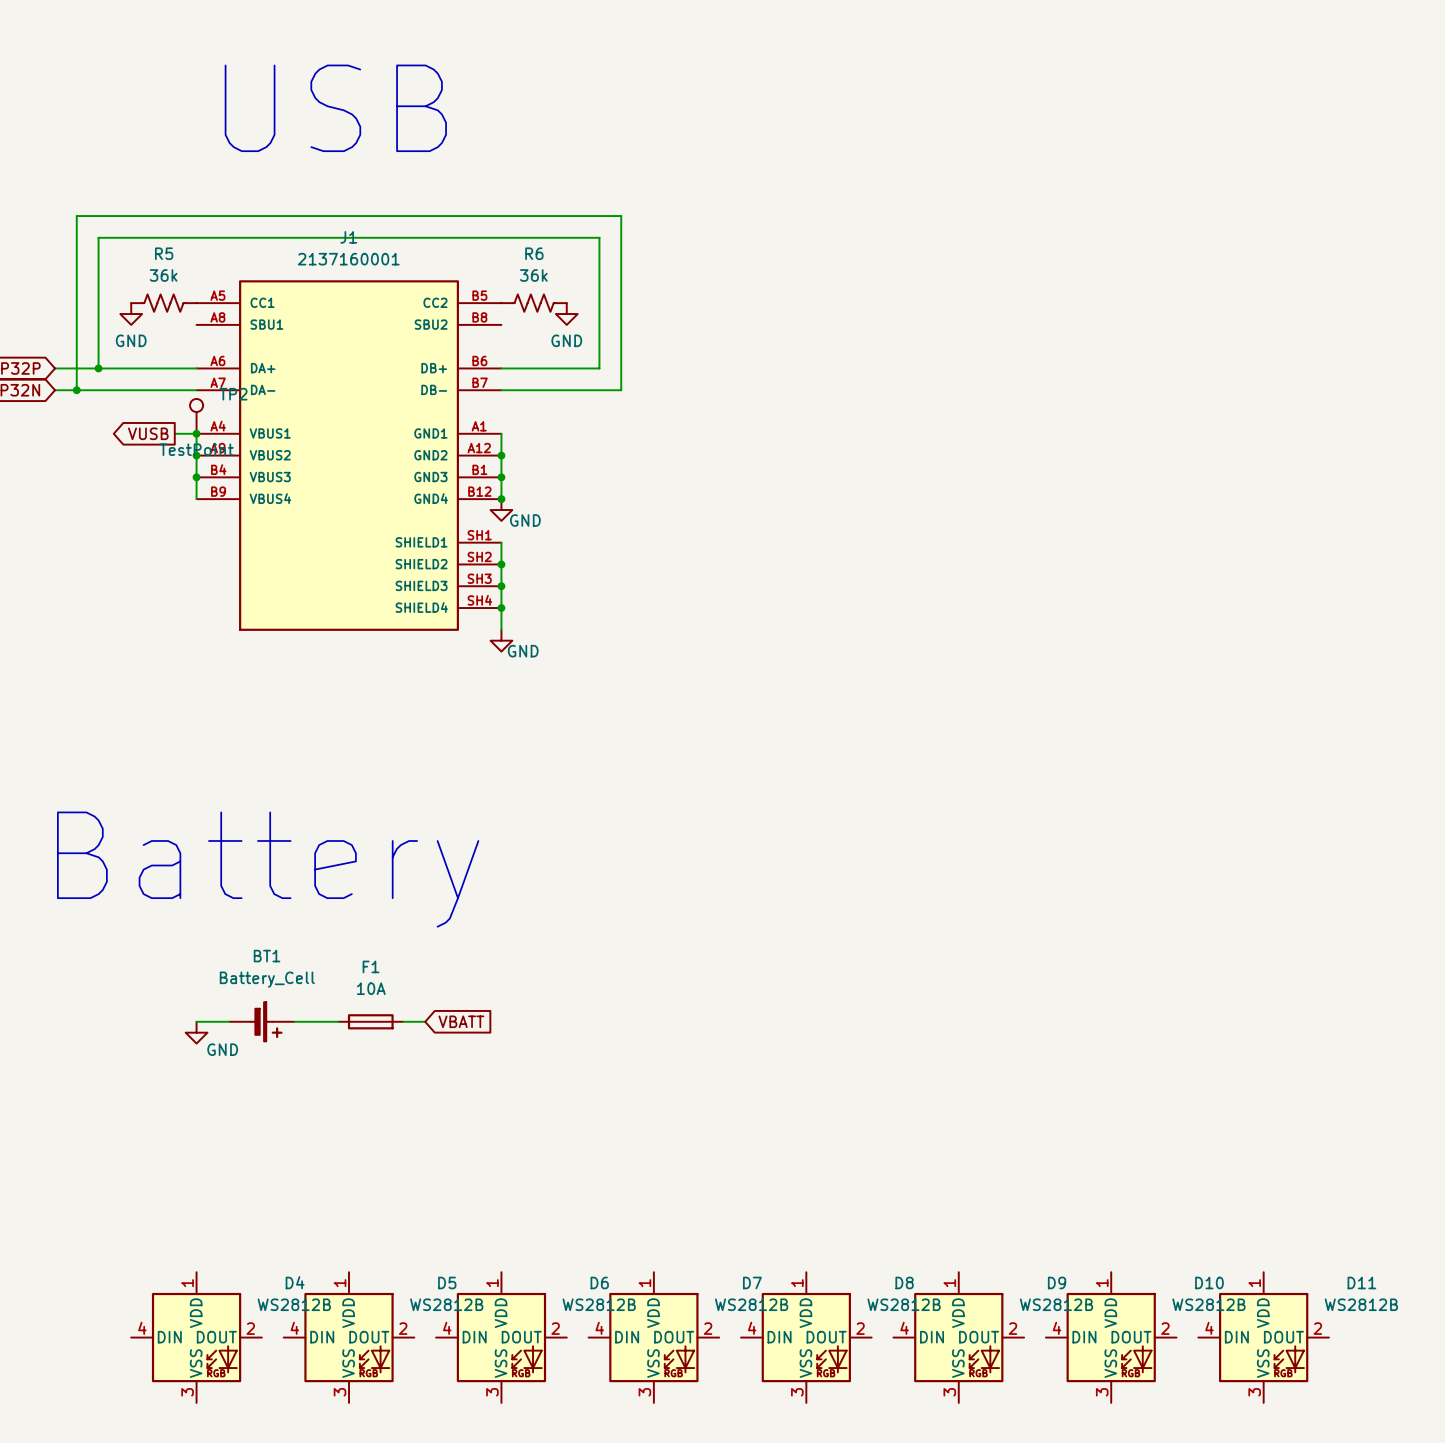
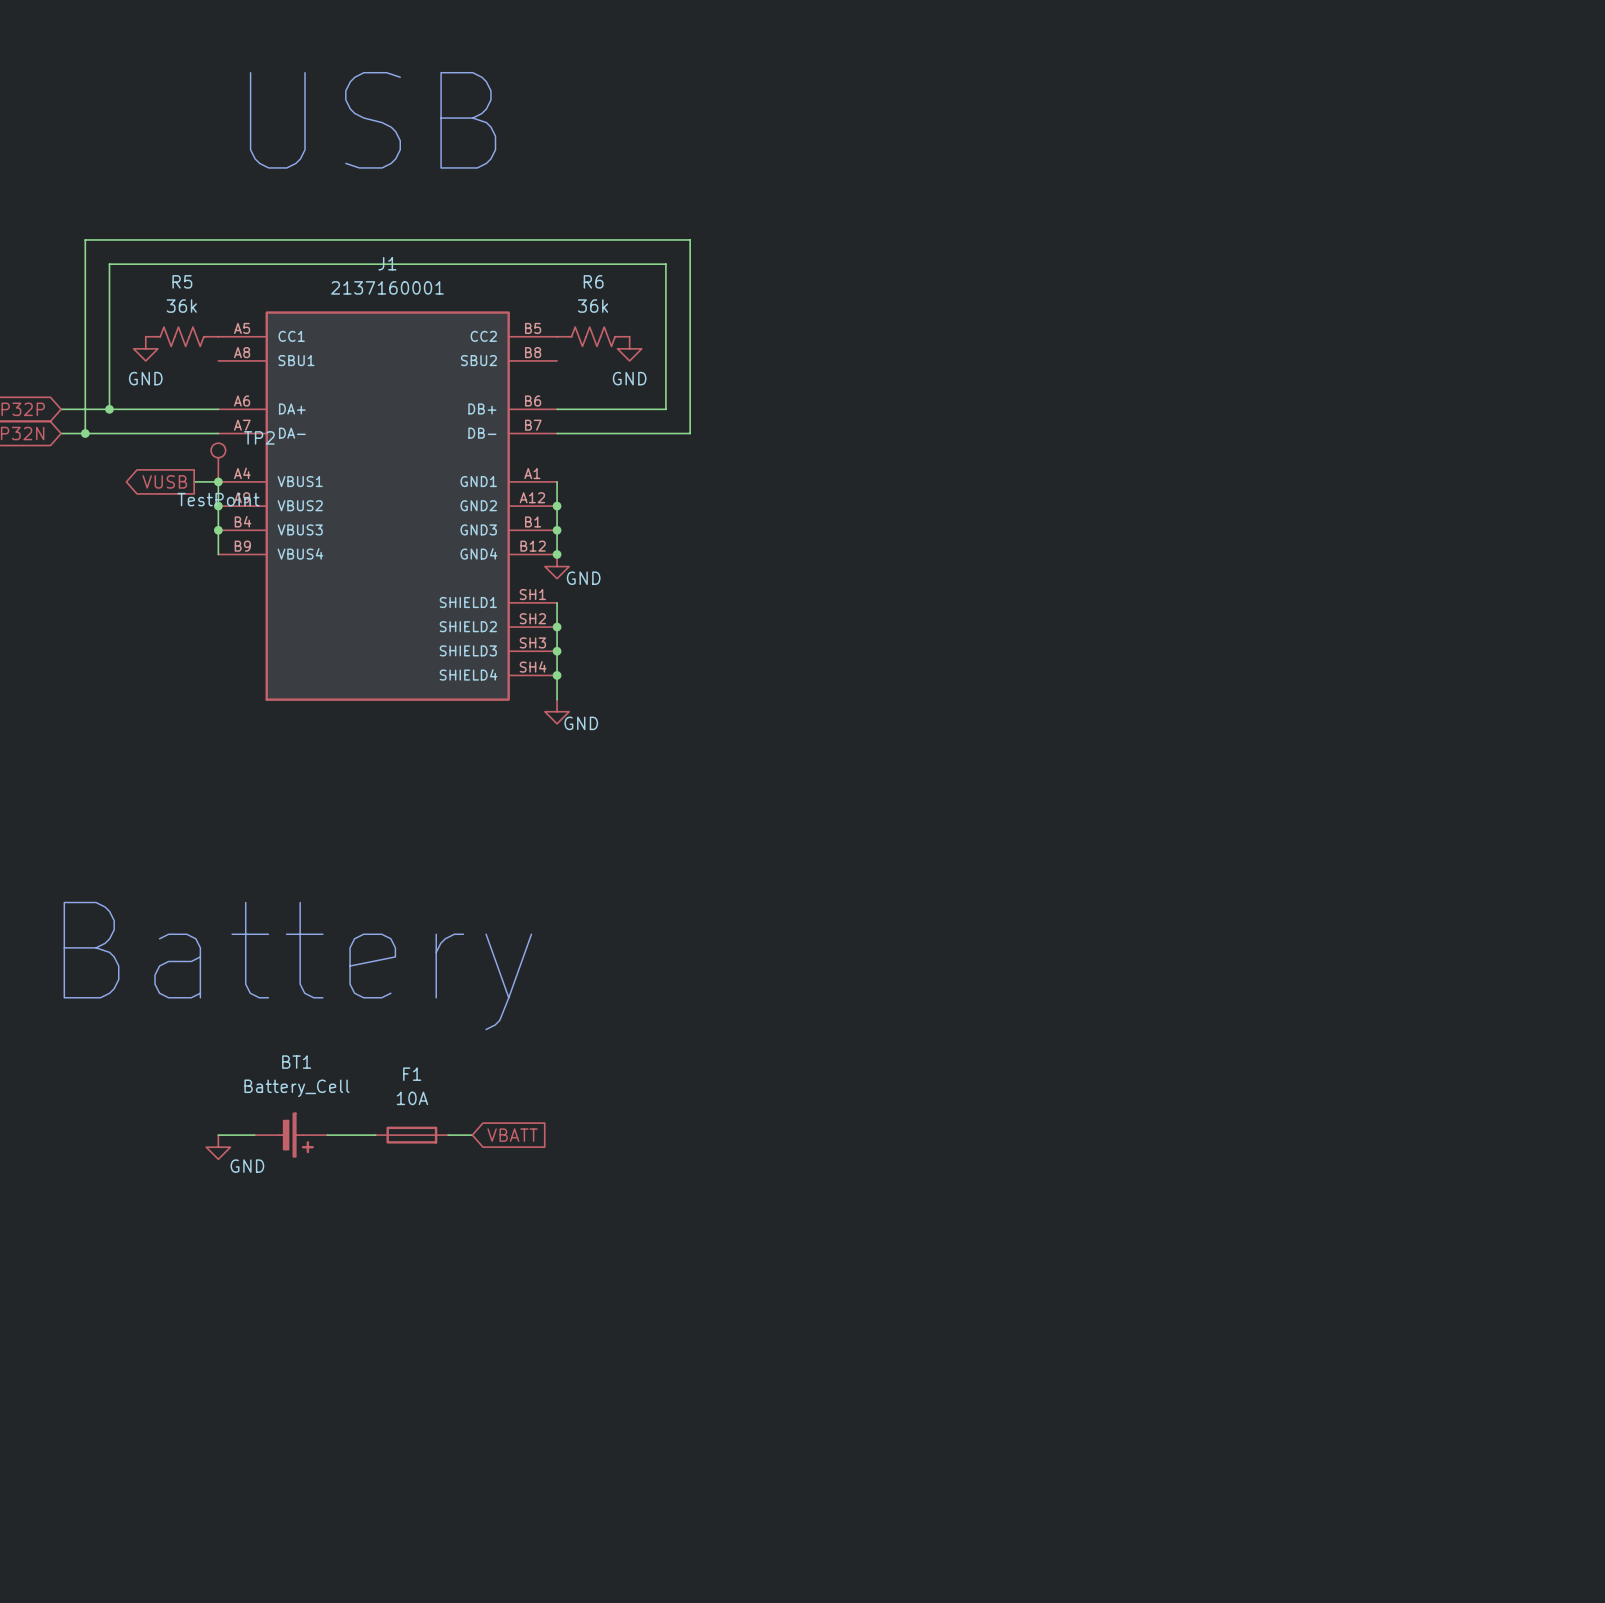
D4: WS2812B (196, 1337) -> none
D5: WS2812B (349, 1337) -> none
D6: WS2812B (501, 1337) -> none
D7: WS2812B (653, 1337) -> none
D8: WS2812B (806, 1337) -> none
D9: WS2812B (958, 1337) -> none
D10: WS2812B (1111, 1337) -> none
D11: WS2812B (1263, 1337) -> none

